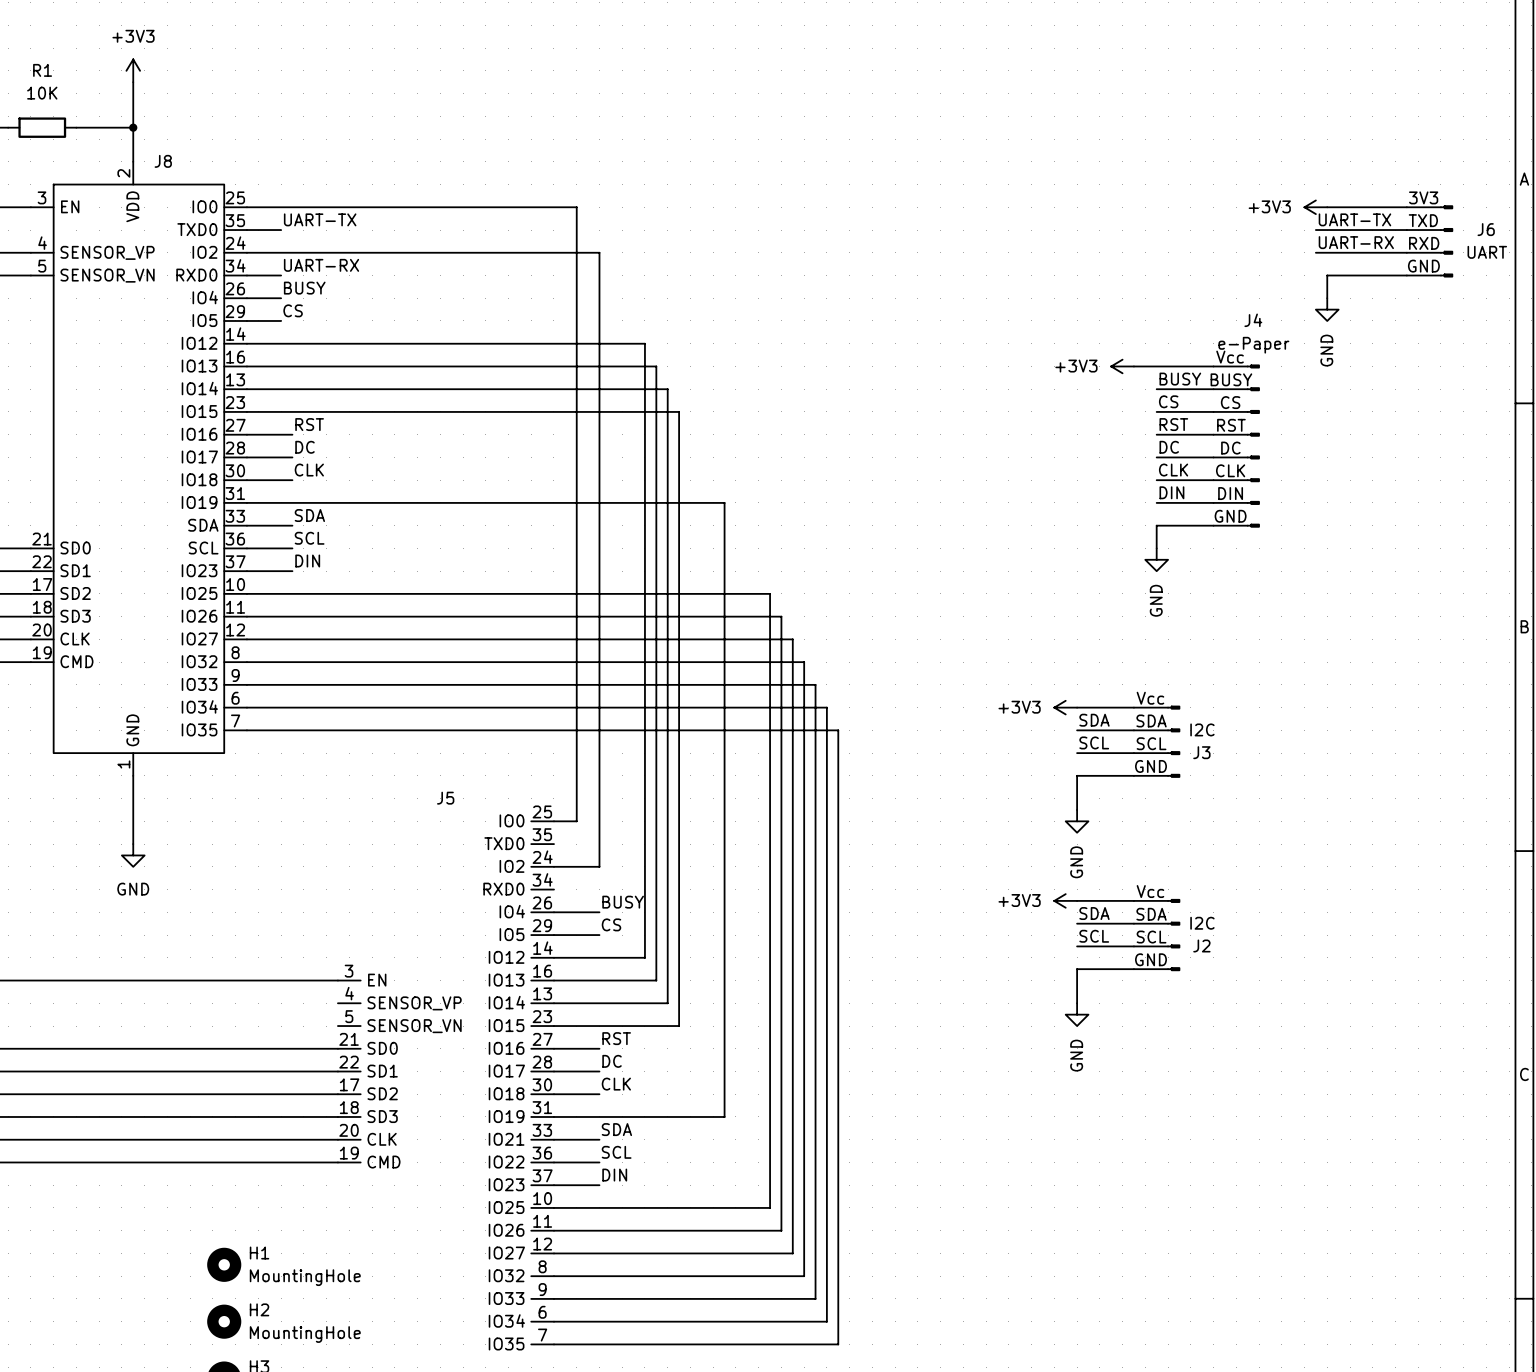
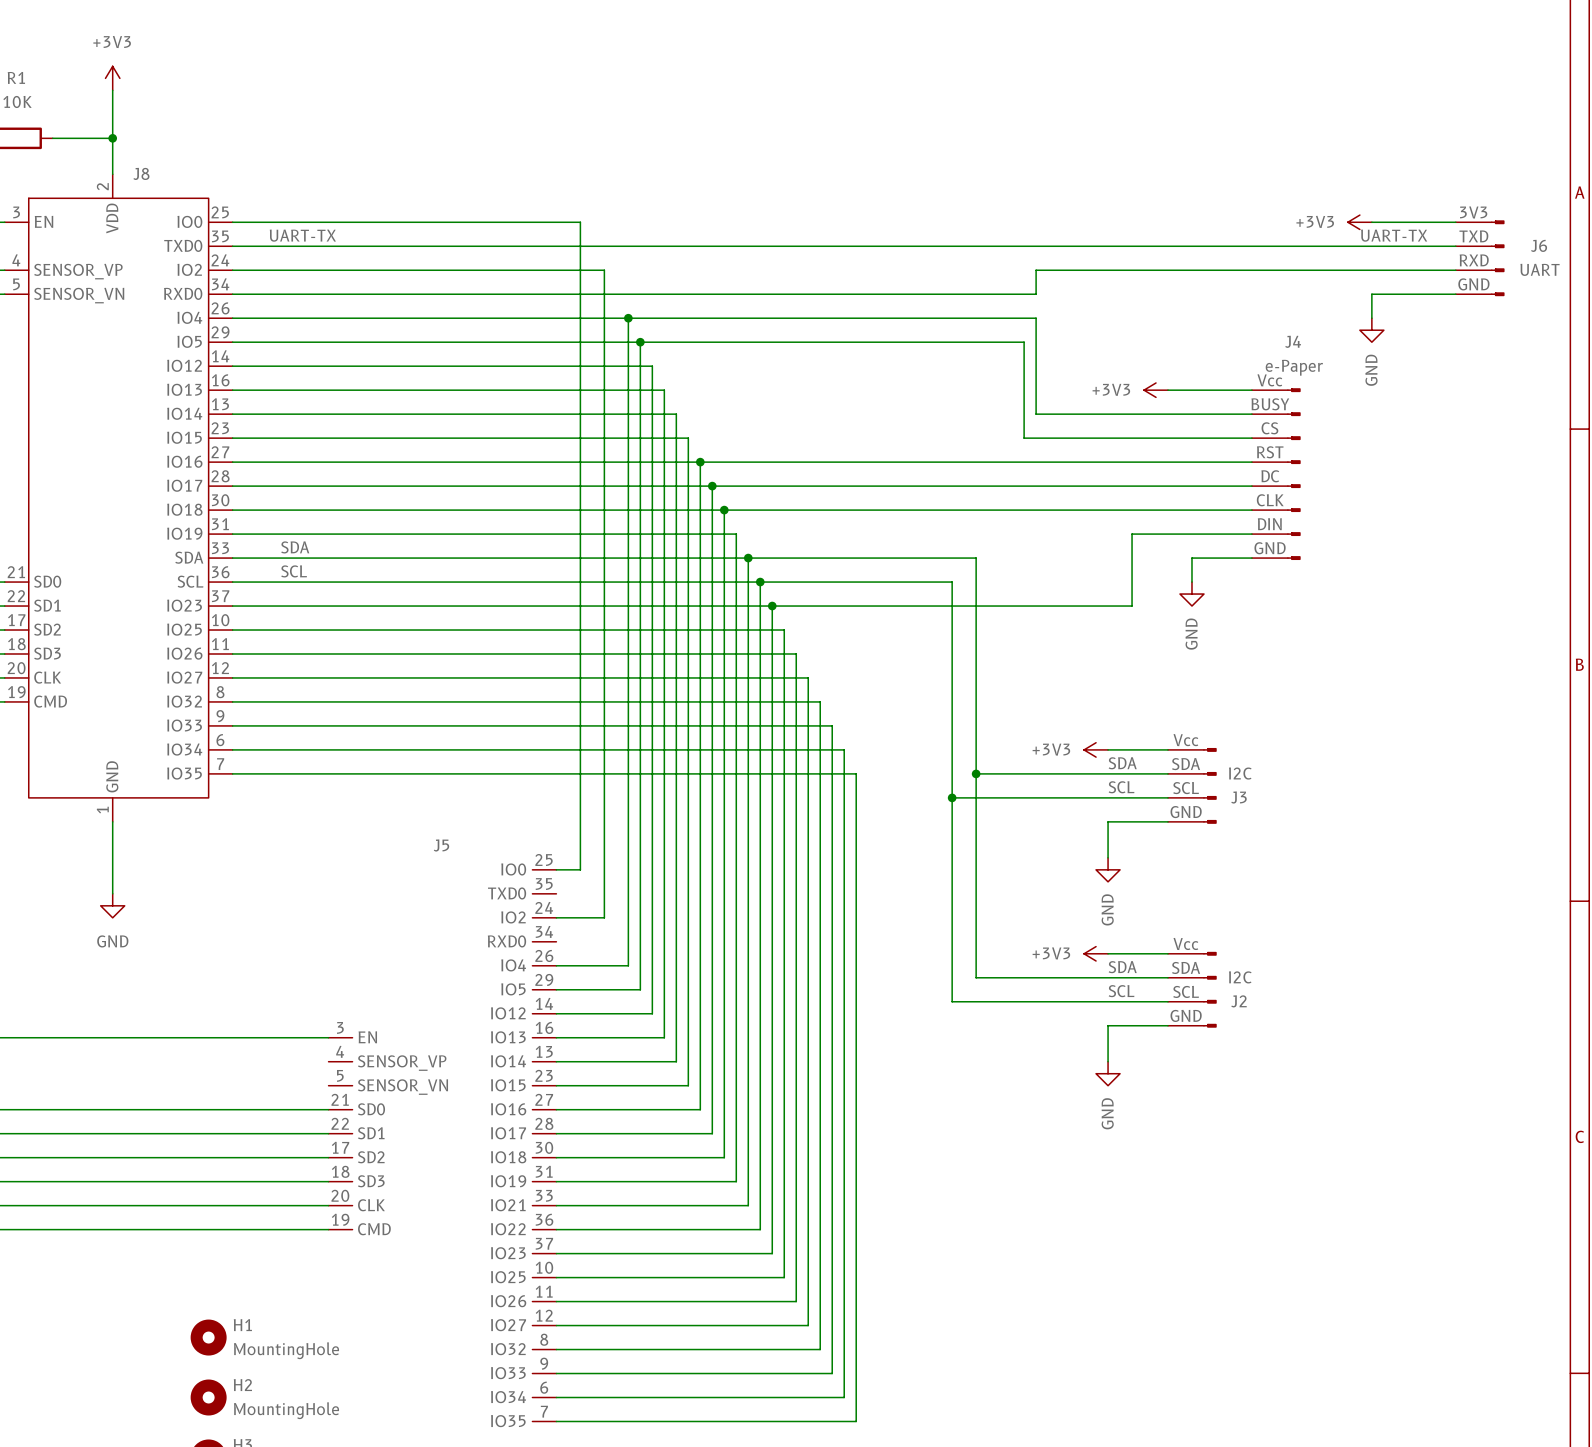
wire: none -> (268, 246) (1359, 246)
label: UART-RX (1356, 242) -> none
wire: none -> (1359, 270) (1036, 270) (1036, 294) (268, 294)
label: UART-RX (321, 265) -> none
label: BUSY (304, 288) -> none
wire: none -> (268, 318) (1036, 318) (1036, 414) (1191, 414)
wire: none -> (628, 318) (628, 965) (604, 965)
junction: none -> (628, 318)
label: CS (293, 310) -> none
wire: none -> (268, 342) (1024, 342) (1024, 438) (1191, 438)
wire: none -> (640, 342) (640, 989) (604, 989)
junction: none -> (640, 342)
label: BUSY (1180, 379) -> none
label: CS (1168, 401) -> none
label: RST (309, 424) -> none
label: RST (1173, 424) -> none
wire: none -> (280, 462) (1191, 462)
wire: none -> (700, 462) (700, 1109) (604, 1109)
junction: none -> (700, 462)
label: DC (304, 447) -> none
label: DC (1169, 447) -> none
wire: none -> (280, 486) (1191, 486)
wire: none -> (712, 486) (712, 1133) (604, 1133)
junction: none -> (712, 486)
label: CLK (309, 470) -> none
label: CLK (1173, 470) -> none
wire: none -> (280, 510) (1191, 510)
wire: none -> (724, 510) (724, 1157) (604, 1157)
junction: none -> (724, 510)
label: DIN (1171, 492) -> none
wire: none -> (1191, 534) (1132, 534) (1132, 606) (280, 606)
wire: none -> (280, 558) (976, 558) (976, 977) (1108, 977)
wire: none -> (748, 558) (748, 1205) (604, 1205)
junction: none -> (748, 558)
wire: none -> (280, 582) (952, 582) (952, 1001) (1108, 1001)
wire: none -> (760, 582) (760, 1229) (604, 1229)
junction: none -> (760, 582)
label: DIN (307, 561) -> none
wire: none -> (772, 606) (772, 1253) (604, 1253)
junction: none -> (772, 606)
wire: none -> (976, 773) (1108, 773)
junction: none -> (976, 773)
wire: none -> (952, 797) (1108, 797)
junction: none -> (952, 797)
label: BUSY (623, 902) -> none
label: CS (611, 924) -> none
label: RST (616, 1038) -> none
label: DC (612, 1061) -> none
label: CLK (616, 1084) -> none
label: SDA (616, 1129) -> none
label: SCL (616, 1152) -> none
label: DIN (614, 1175) -> none

